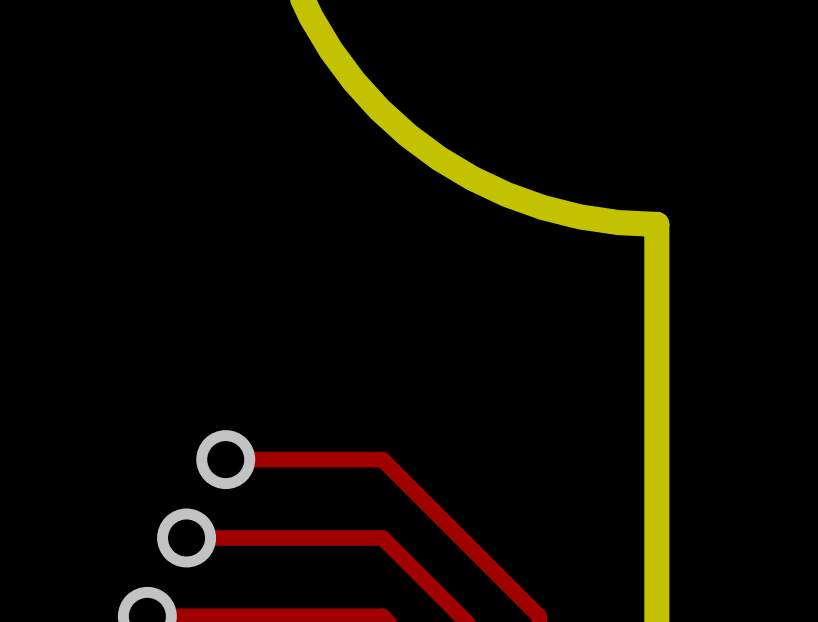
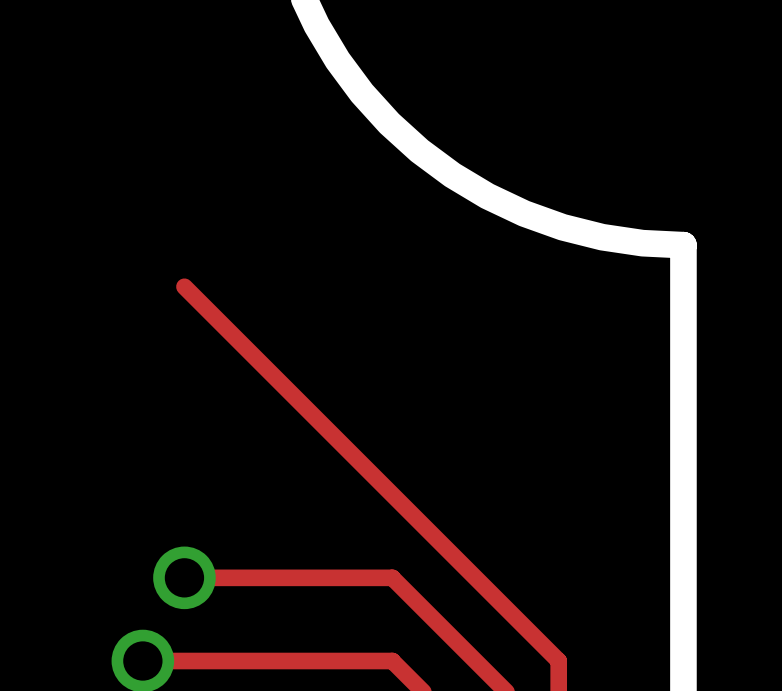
track: (225, 459) (382, 459) -> (184, 286) (392, 494)
via: (225, 459) -> none

